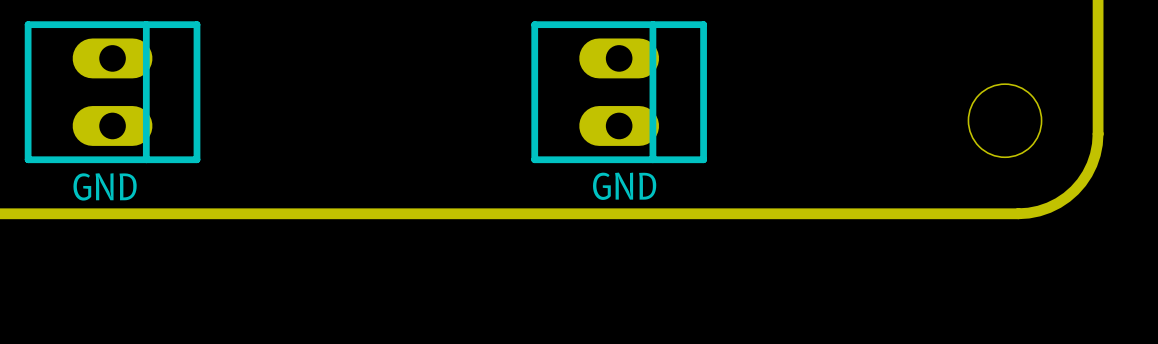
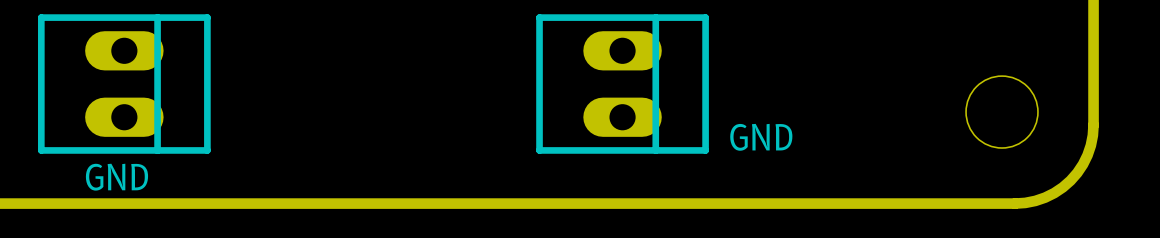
text position: GND (624, 186) -> GND (761, 137)

